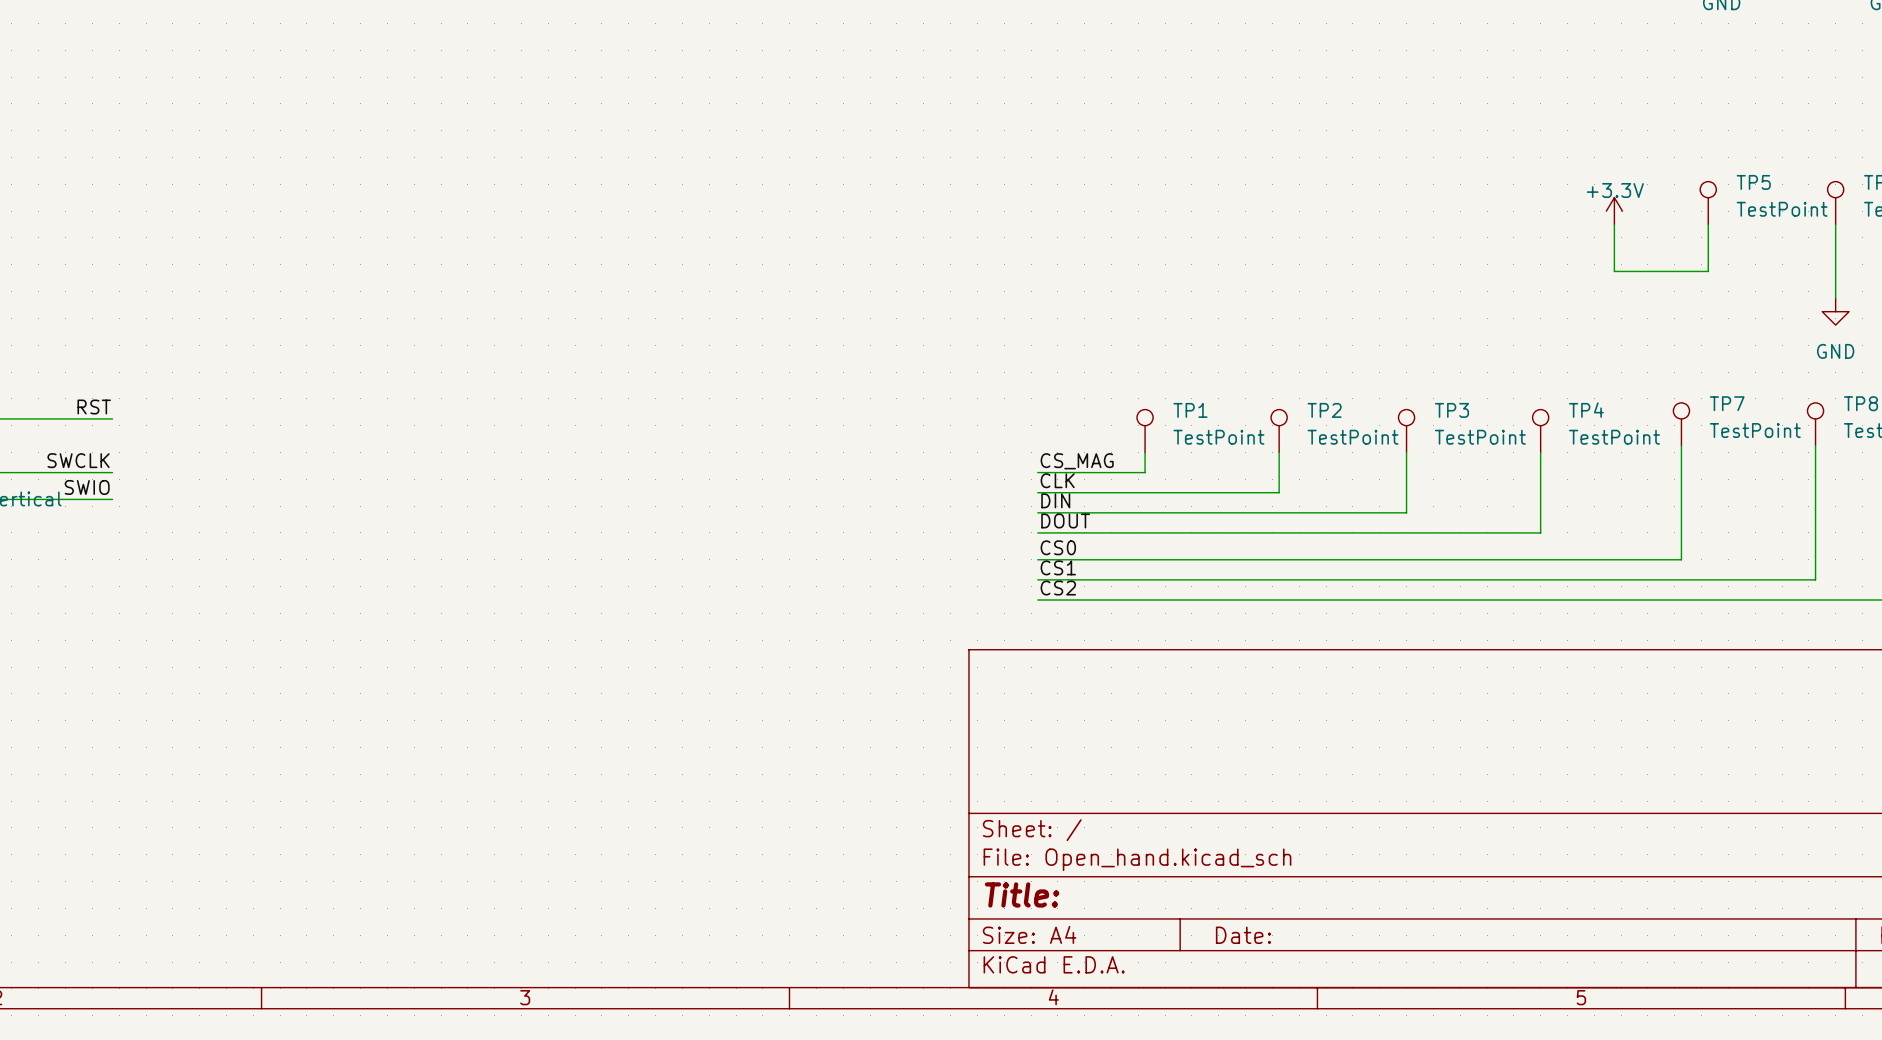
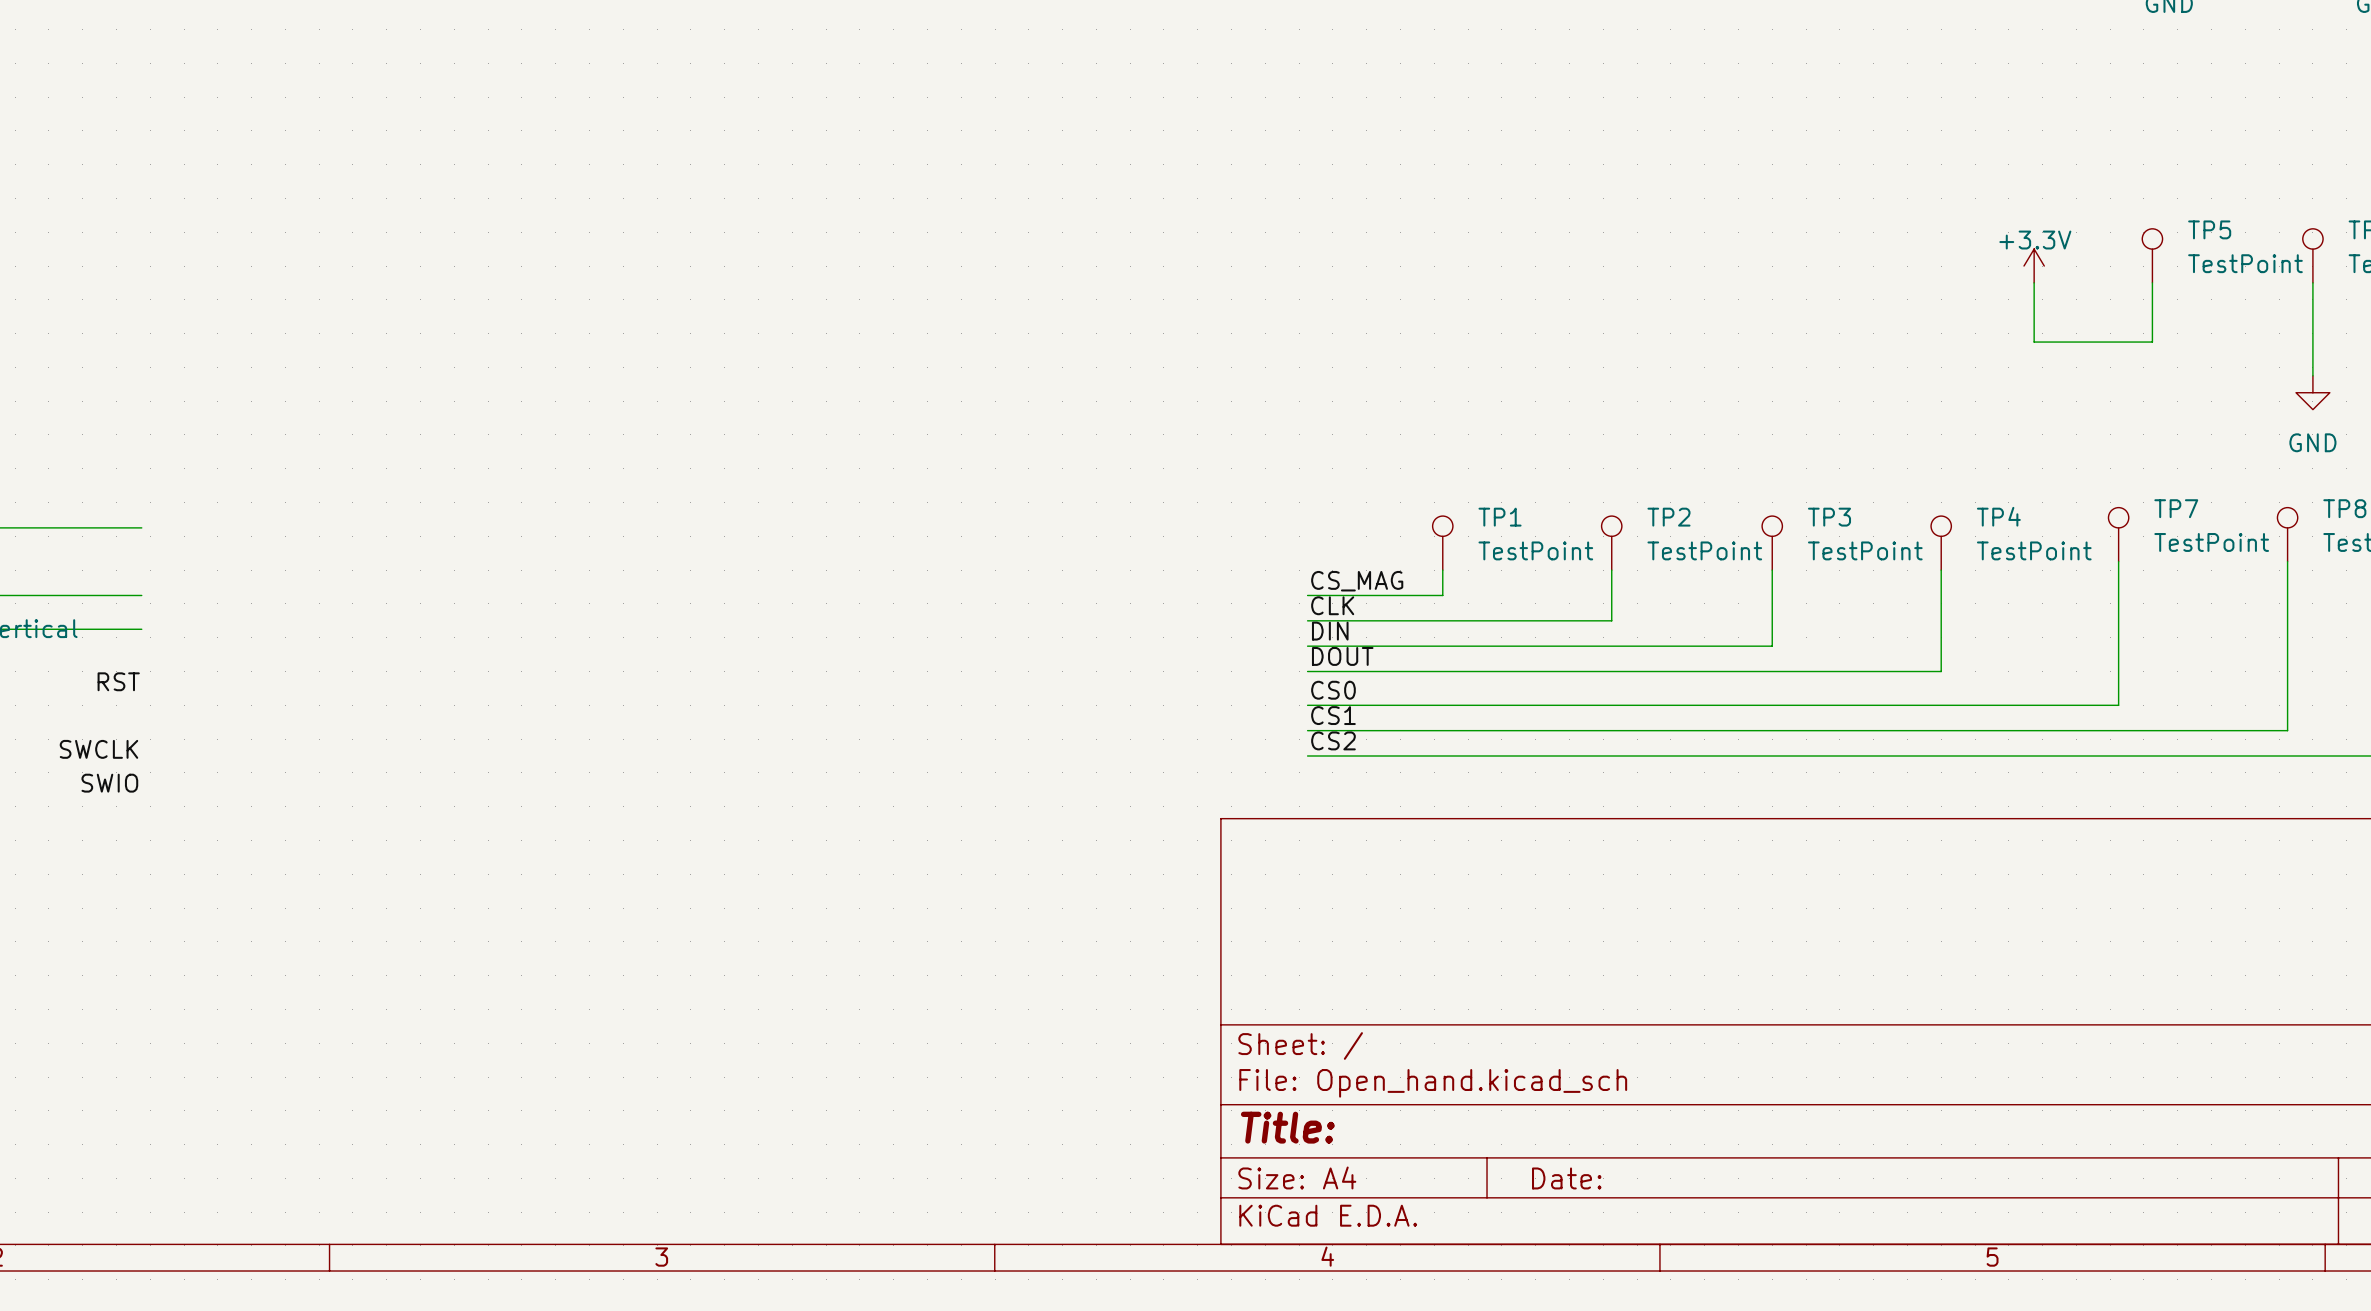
label position: RST (94, 407) -> RST (118, 681)
label position: SWCLK (78, 460) -> SWCLK (98, 749)
label position: SWIO (87, 487) -> SWIO (109, 783)

